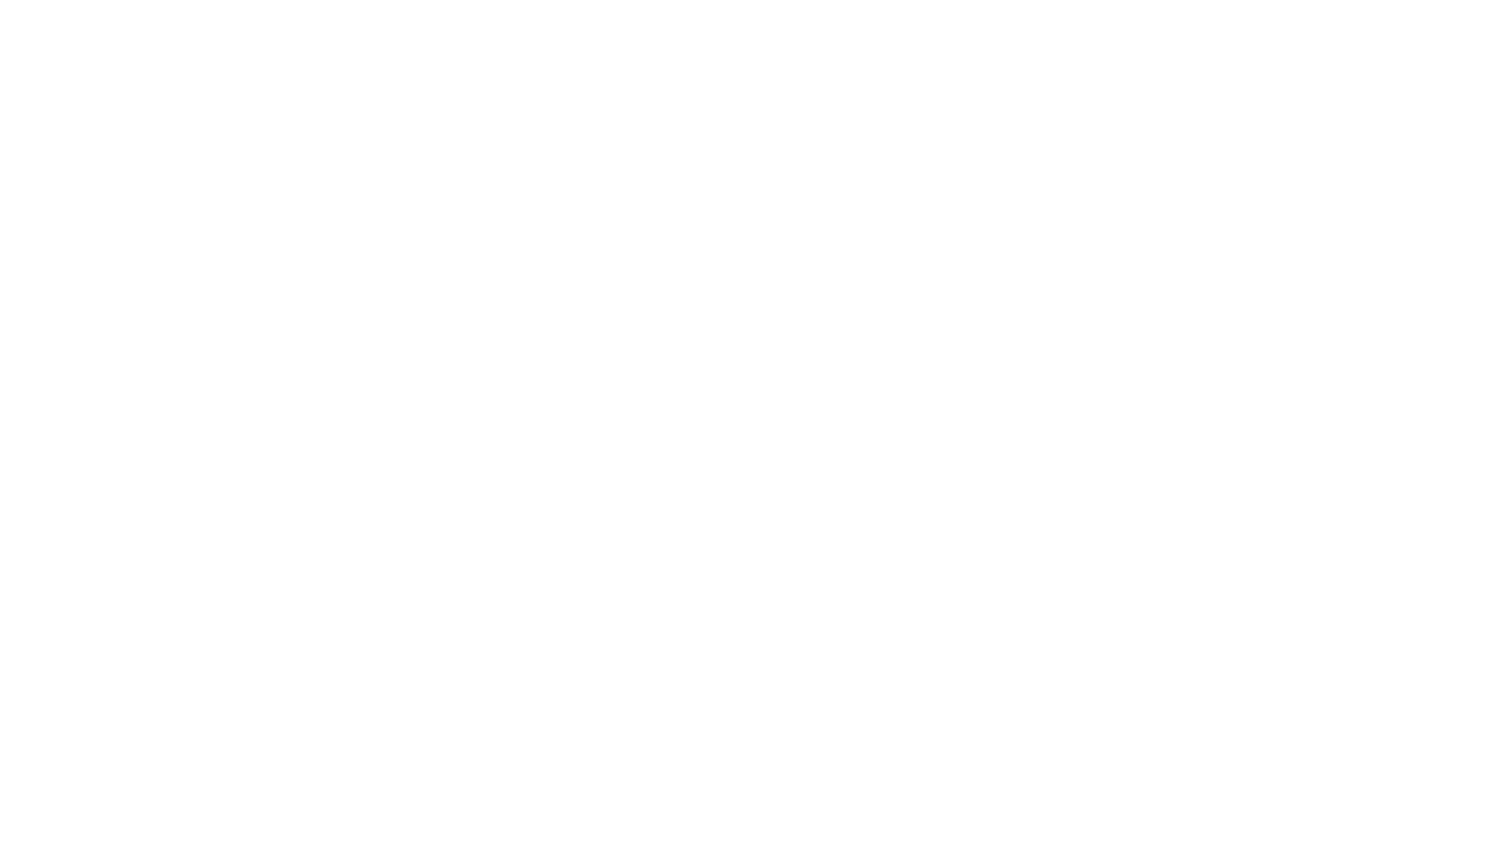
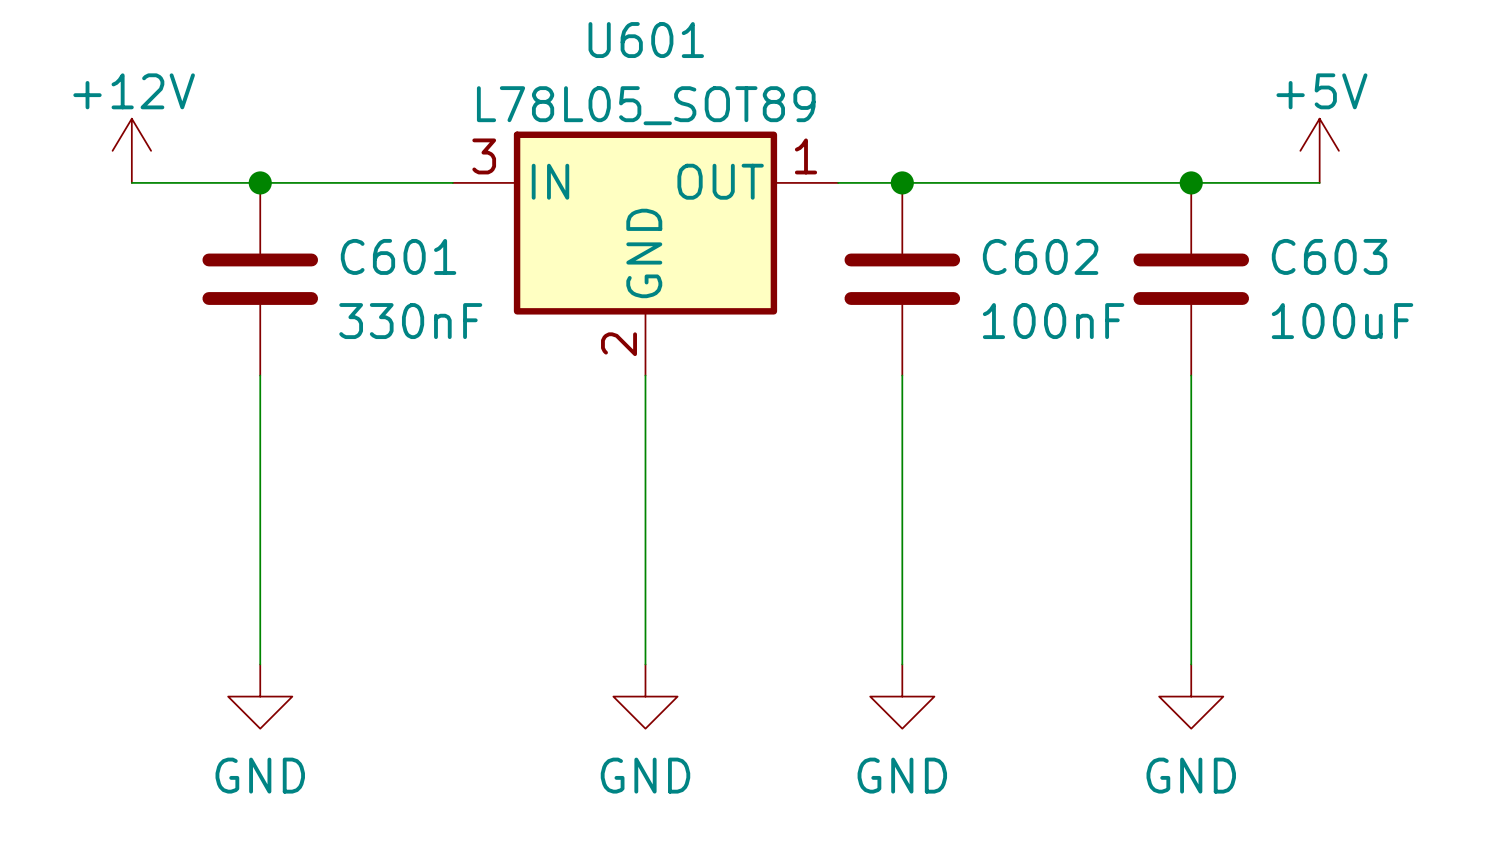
power symbol: none -> +12V (131, 150)
power symbol: none -> +5V (1319, 150)
wire: none -> (131, 182) (452, 182)
junction: none -> (260, 182)
wire: none -> (838, 182) (1319, 182)
junction: none -> (902, 182)
junction: none -> (1191, 182)
U601: none -> L78L05_SOT89 (645, 253)
C601: none -> 330nF (260, 279)
C602: none -> 100nF (902, 279)
C603: none -> 100uF (1191, 279)
wire: none -> (260, 375) (260, 664)
wire: none -> (645, 375) (645, 664)
wire: none -> (902, 375) (902, 664)
wire: none -> (1191, 375) (1191, 664)
power symbol: none -> GND (260, 696)
power symbol: none -> GND (645, 696)
power symbol: none -> GND (902, 696)
power symbol: none -> GND (1191, 696)

